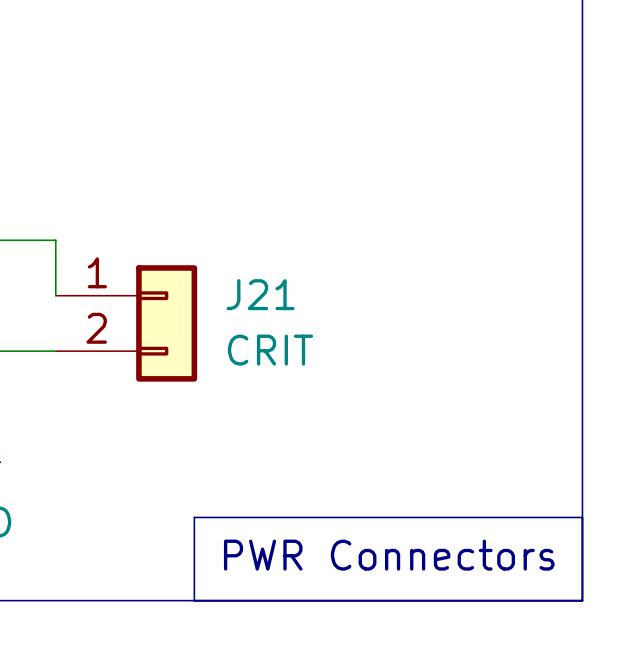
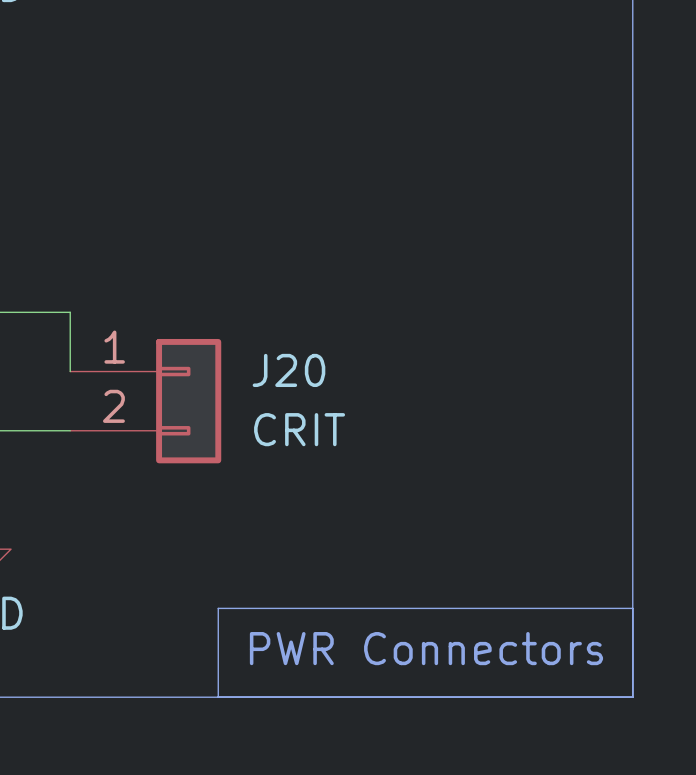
J21 name: J21 (260, 294) -> J20 (288, 370)

